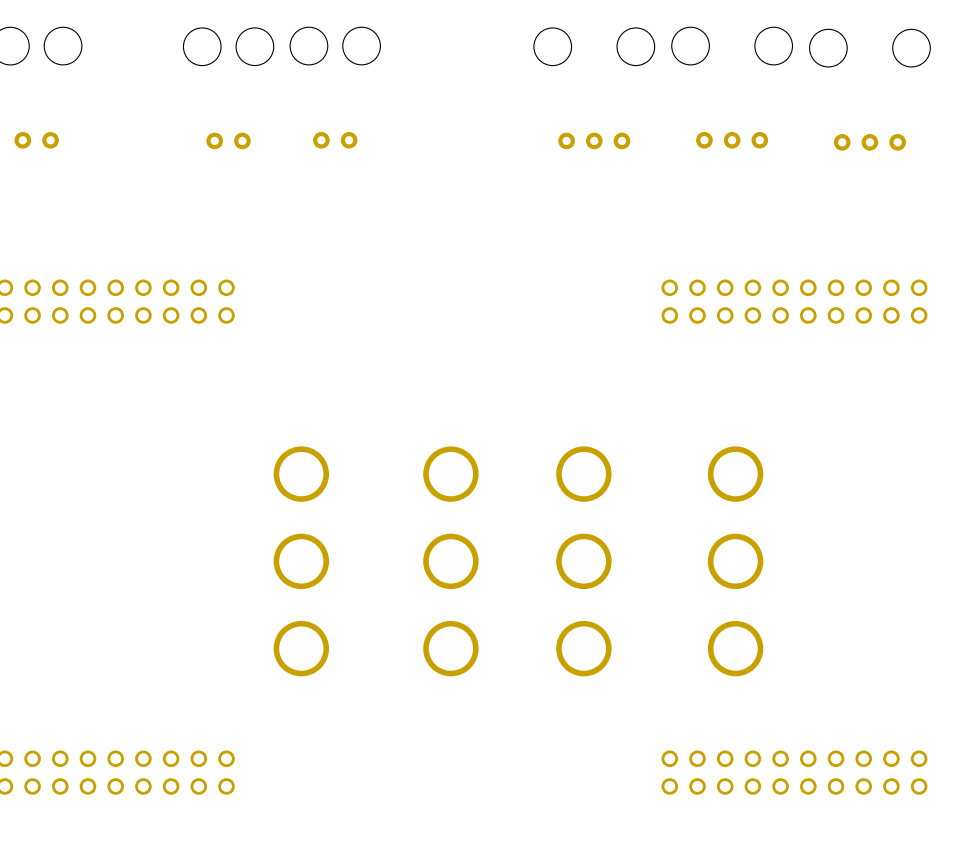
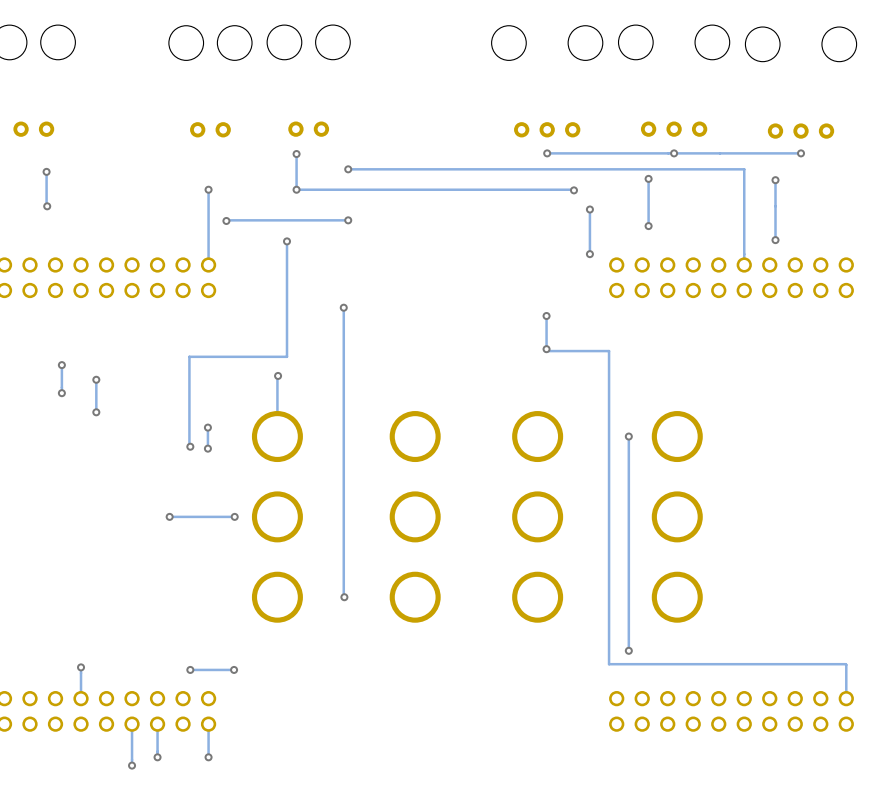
via: none -> (547, 153)
via: none -> (674, 153)
track: none -> (801, 153) (547, 153)
via: none -> (801, 153)
track: none -> (296, 154) (296, 189) (573, 190)
via: none -> (296, 154)
track: none -> (348, 169) (744, 169) (744, 264)
via: none -> (348, 169)
track: none -> (46, 171) (47, 206)
via: none -> (46, 171)
track: none -> (648, 178) (648, 226)
via: none -> (648, 178)
track: none -> (775, 180) (775, 240)
via: none -> (775, 180)
track: none -> (208, 189) (208, 264)
via: none -> (208, 189)
via: none -> (296, 189)
via: none -> (573, 190)
via: none -> (47, 206)
track: none -> (589, 209) (589, 254)
via: none -> (589, 209)
track: none -> (348, 220) (226, 220)
via: none -> (348, 220)
via: none -> (226, 220)
via: none -> (648, 226)
via: none -> (775, 240)
track: none -> (287, 241) (287, 356) (189, 356) (190, 446)
via: none -> (287, 241)
via: none -> (589, 254)
track: none -> (343, 307) (344, 597)
via: none -> (343, 307)
track: none -> (546, 316) (546, 351)
via: none -> (546, 316)
via: none -> (546, 349)
track: none -> (546, 351) (609, 351) (609, 664) (845, 664) (846, 698)
track: none -> (61, 365) (61, 393)
via: none -> (61, 365)
track: none -> (278, 375) (277, 436)
via: none -> (278, 375)
track: none -> (96, 379) (96, 412)
via: none -> (96, 379)
via: none -> (61, 393)
via: none -> (96, 412)
track: none -> (207, 427) (207, 448)
via: none -> (207, 427)
track: none -> (628, 436) (628, 650)
via: none -> (628, 436)
via: none -> (190, 446)
via: none -> (207, 448)
via: none -> (169, 516)
track: none -> (234, 516) (169, 516)
via: none -> (234, 516)
via: none -> (344, 597)
via: none -> (628, 650)
track: none -> (81, 667) (81, 698)
via: none -> (81, 667)
track: none -> (189, 669) (233, 670)
via: none -> (190, 669)
via: none -> (234, 669)
track: none -> (132, 724) (132, 765)
track: none -> (157, 724) (157, 757)
track: none -> (208, 724) (208, 757)
via: none -> (157, 757)
via: none -> (208, 757)
via: none -> (132, 765)

